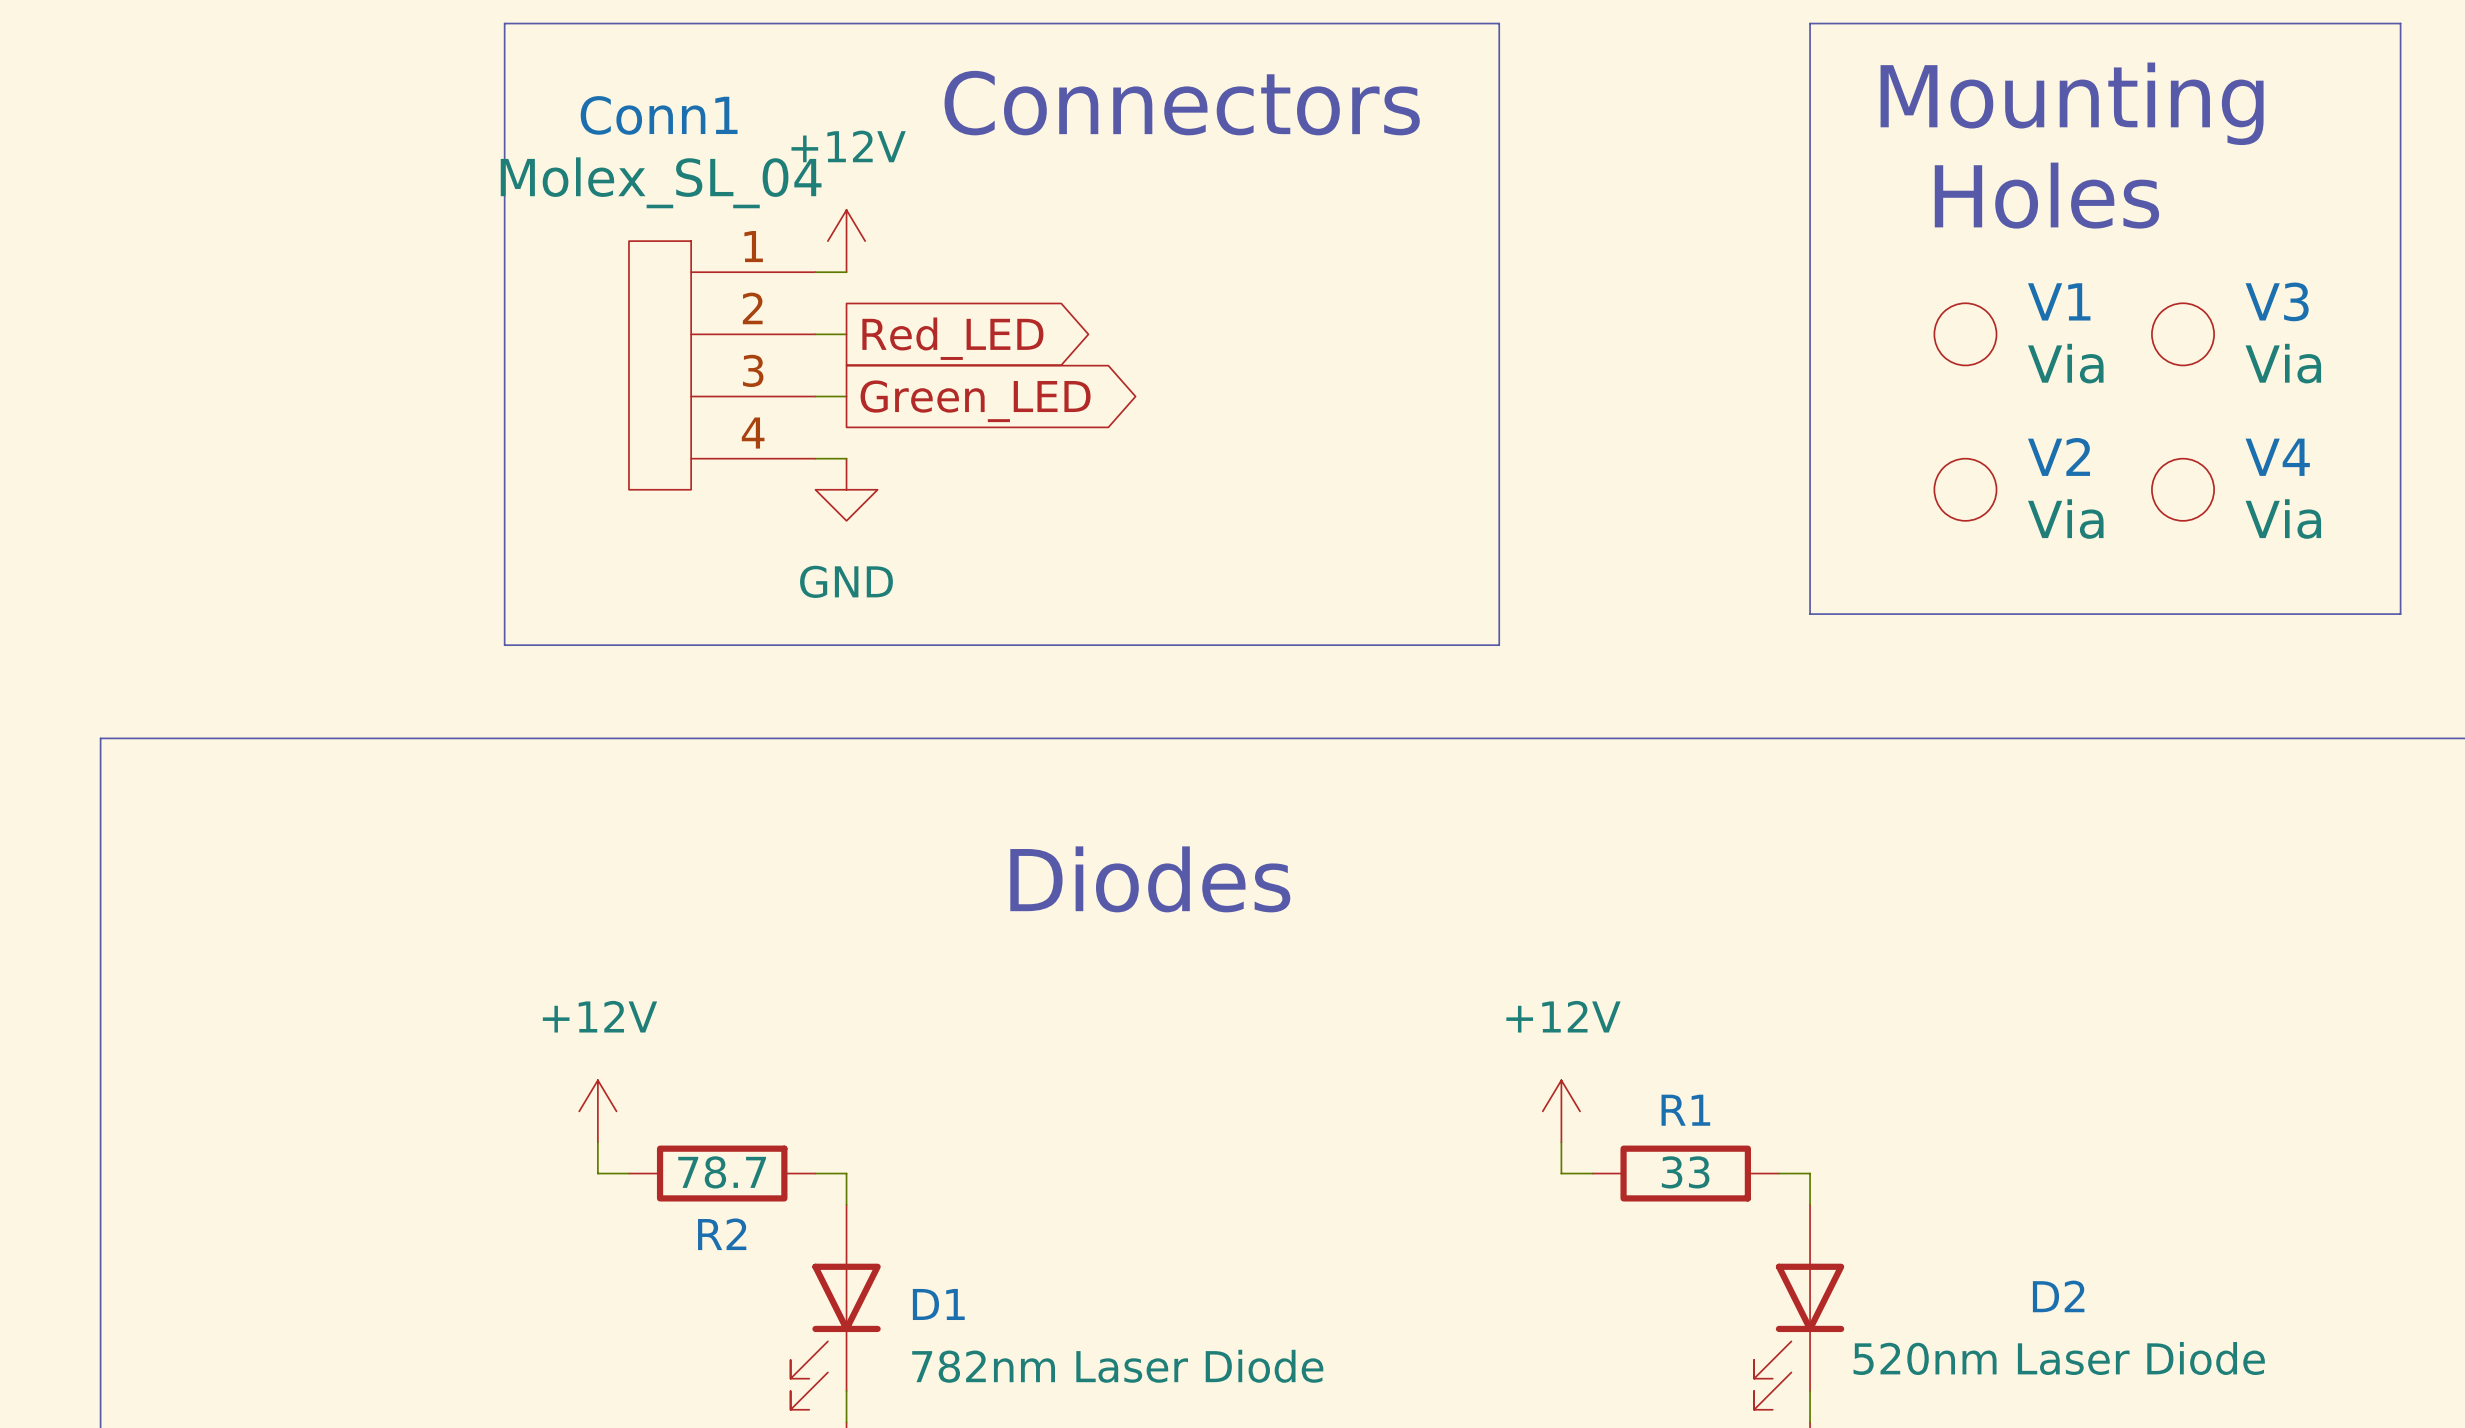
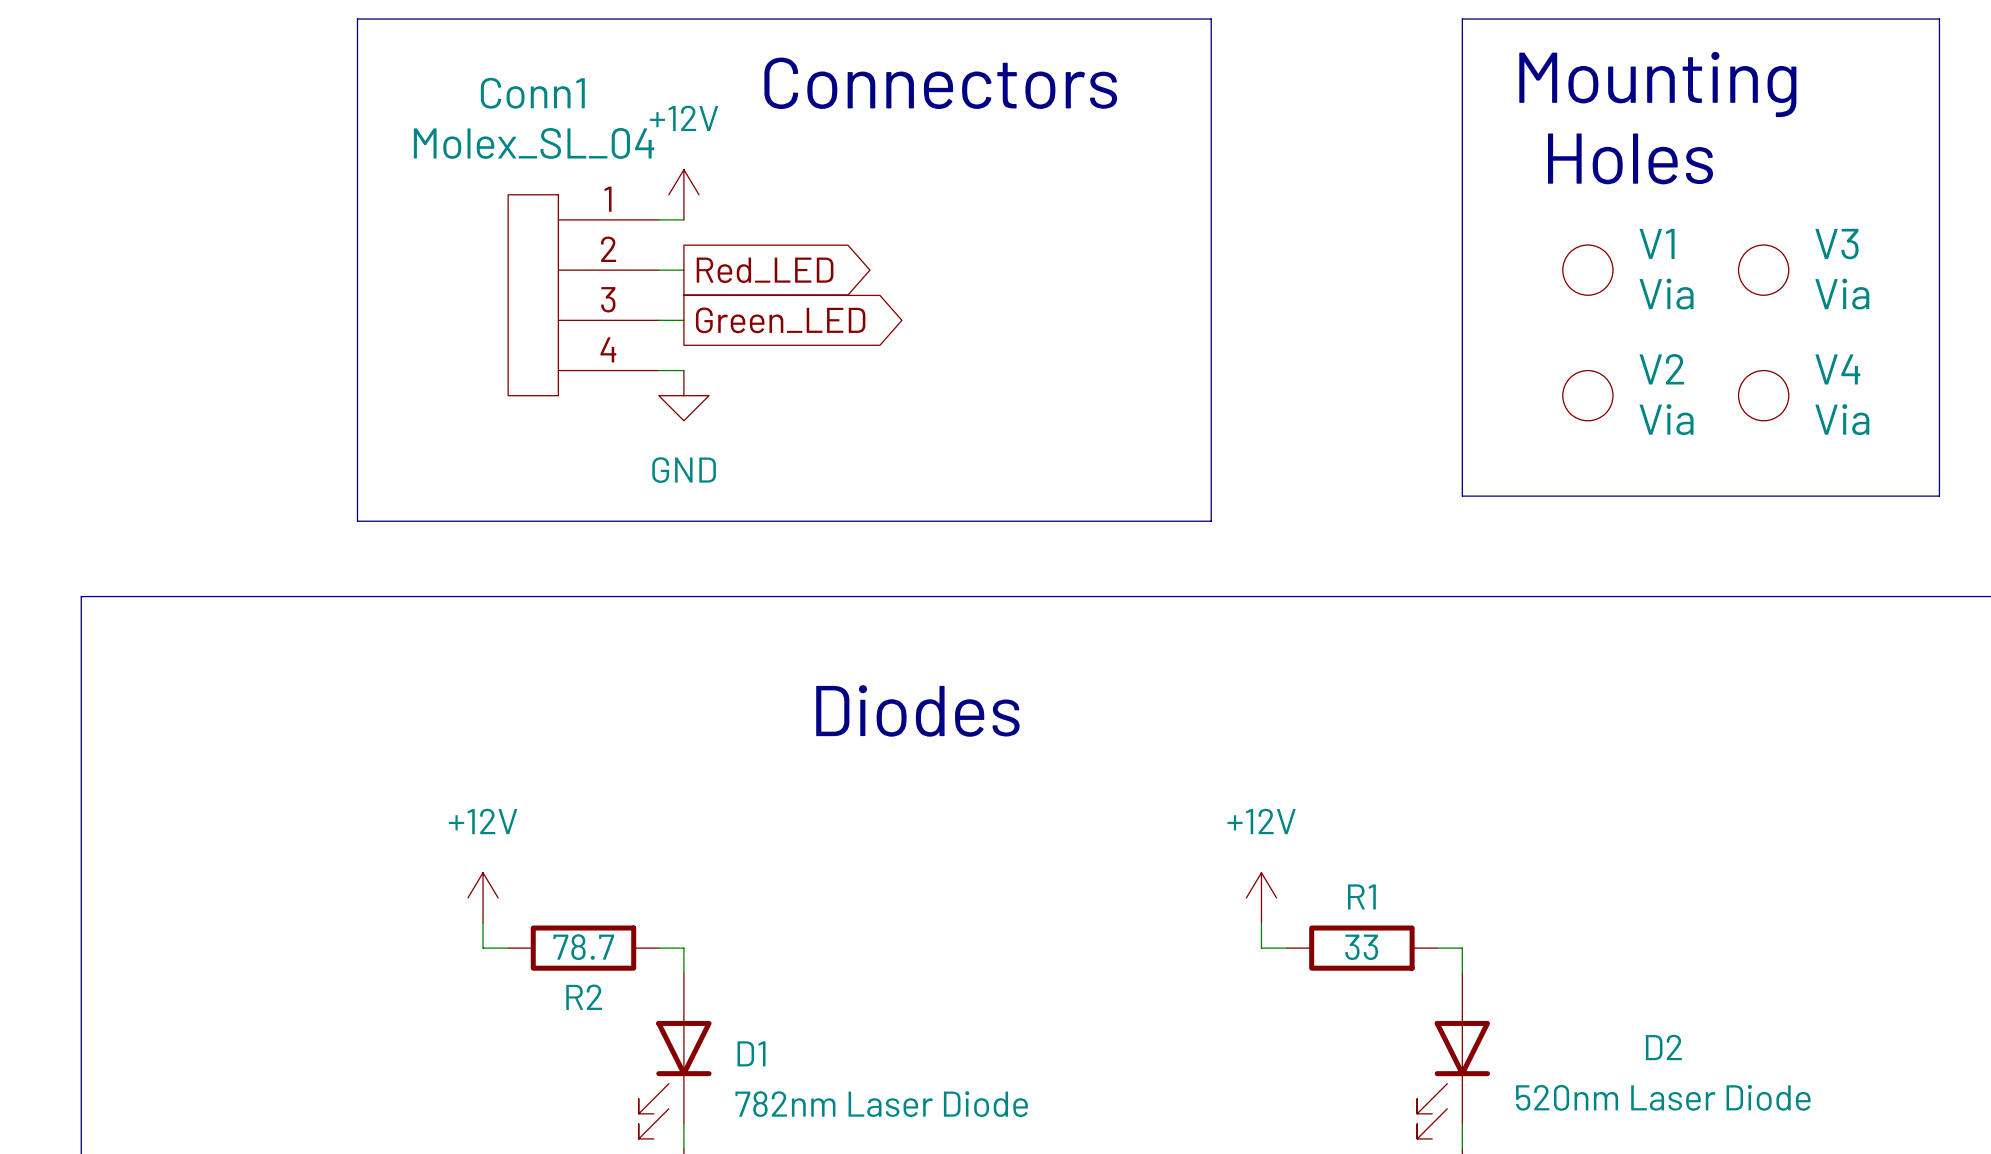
line: (504, 23) (504, 645) -> (407, 19) (357, 19) (357, 521) (407, 521)

